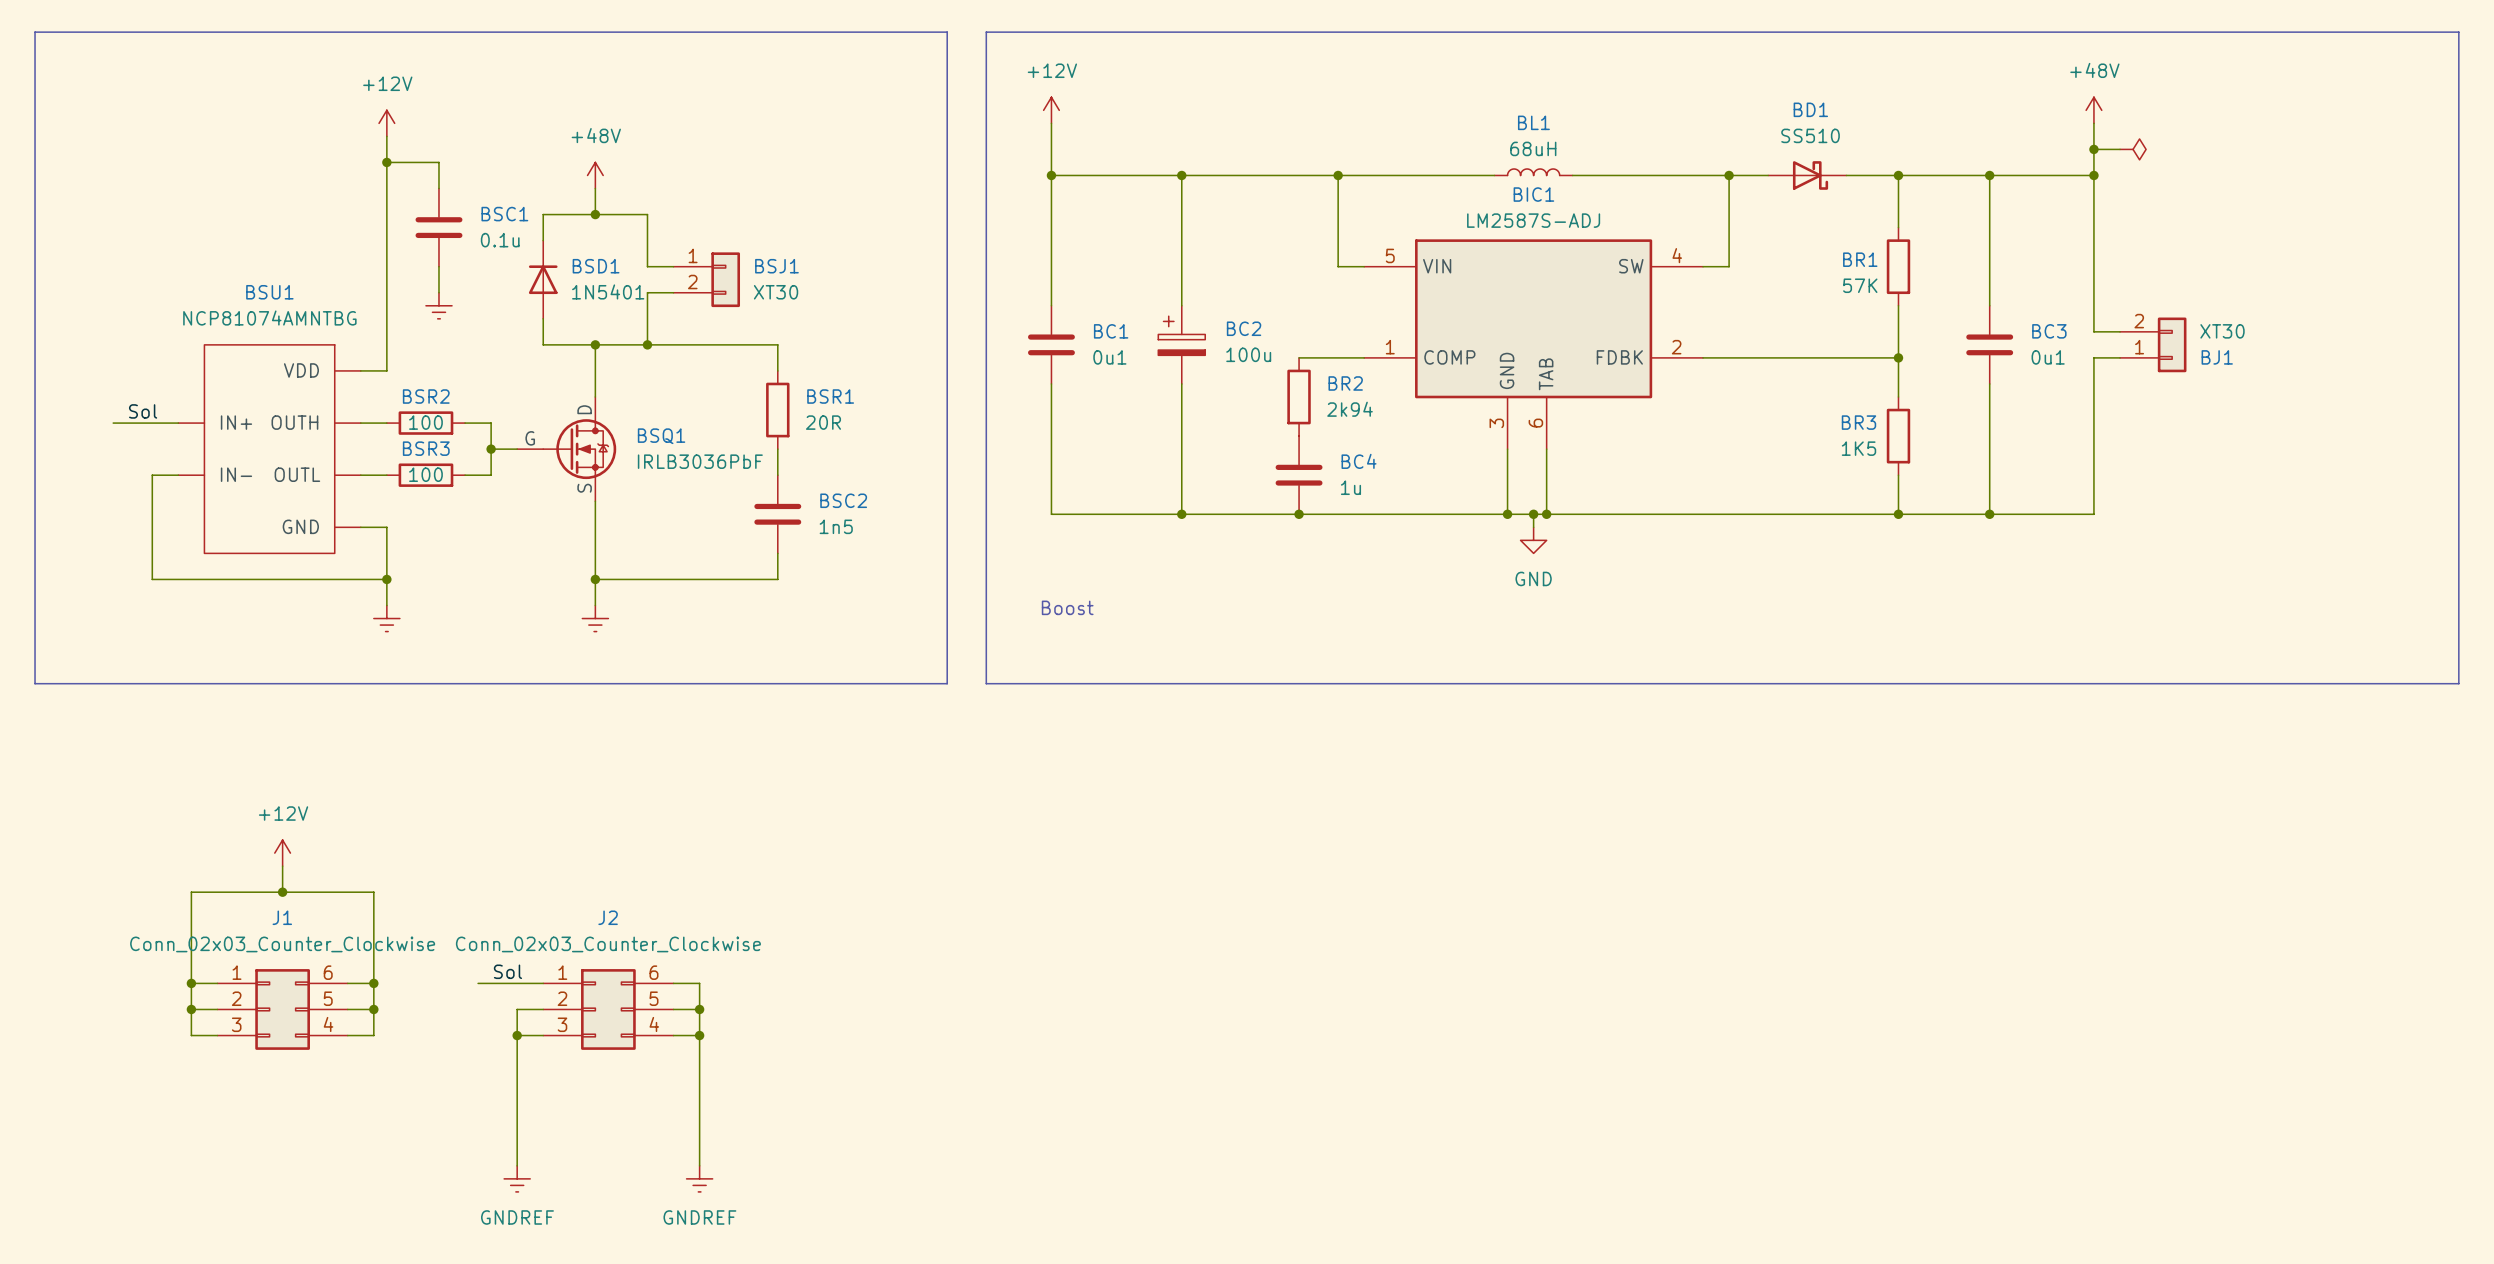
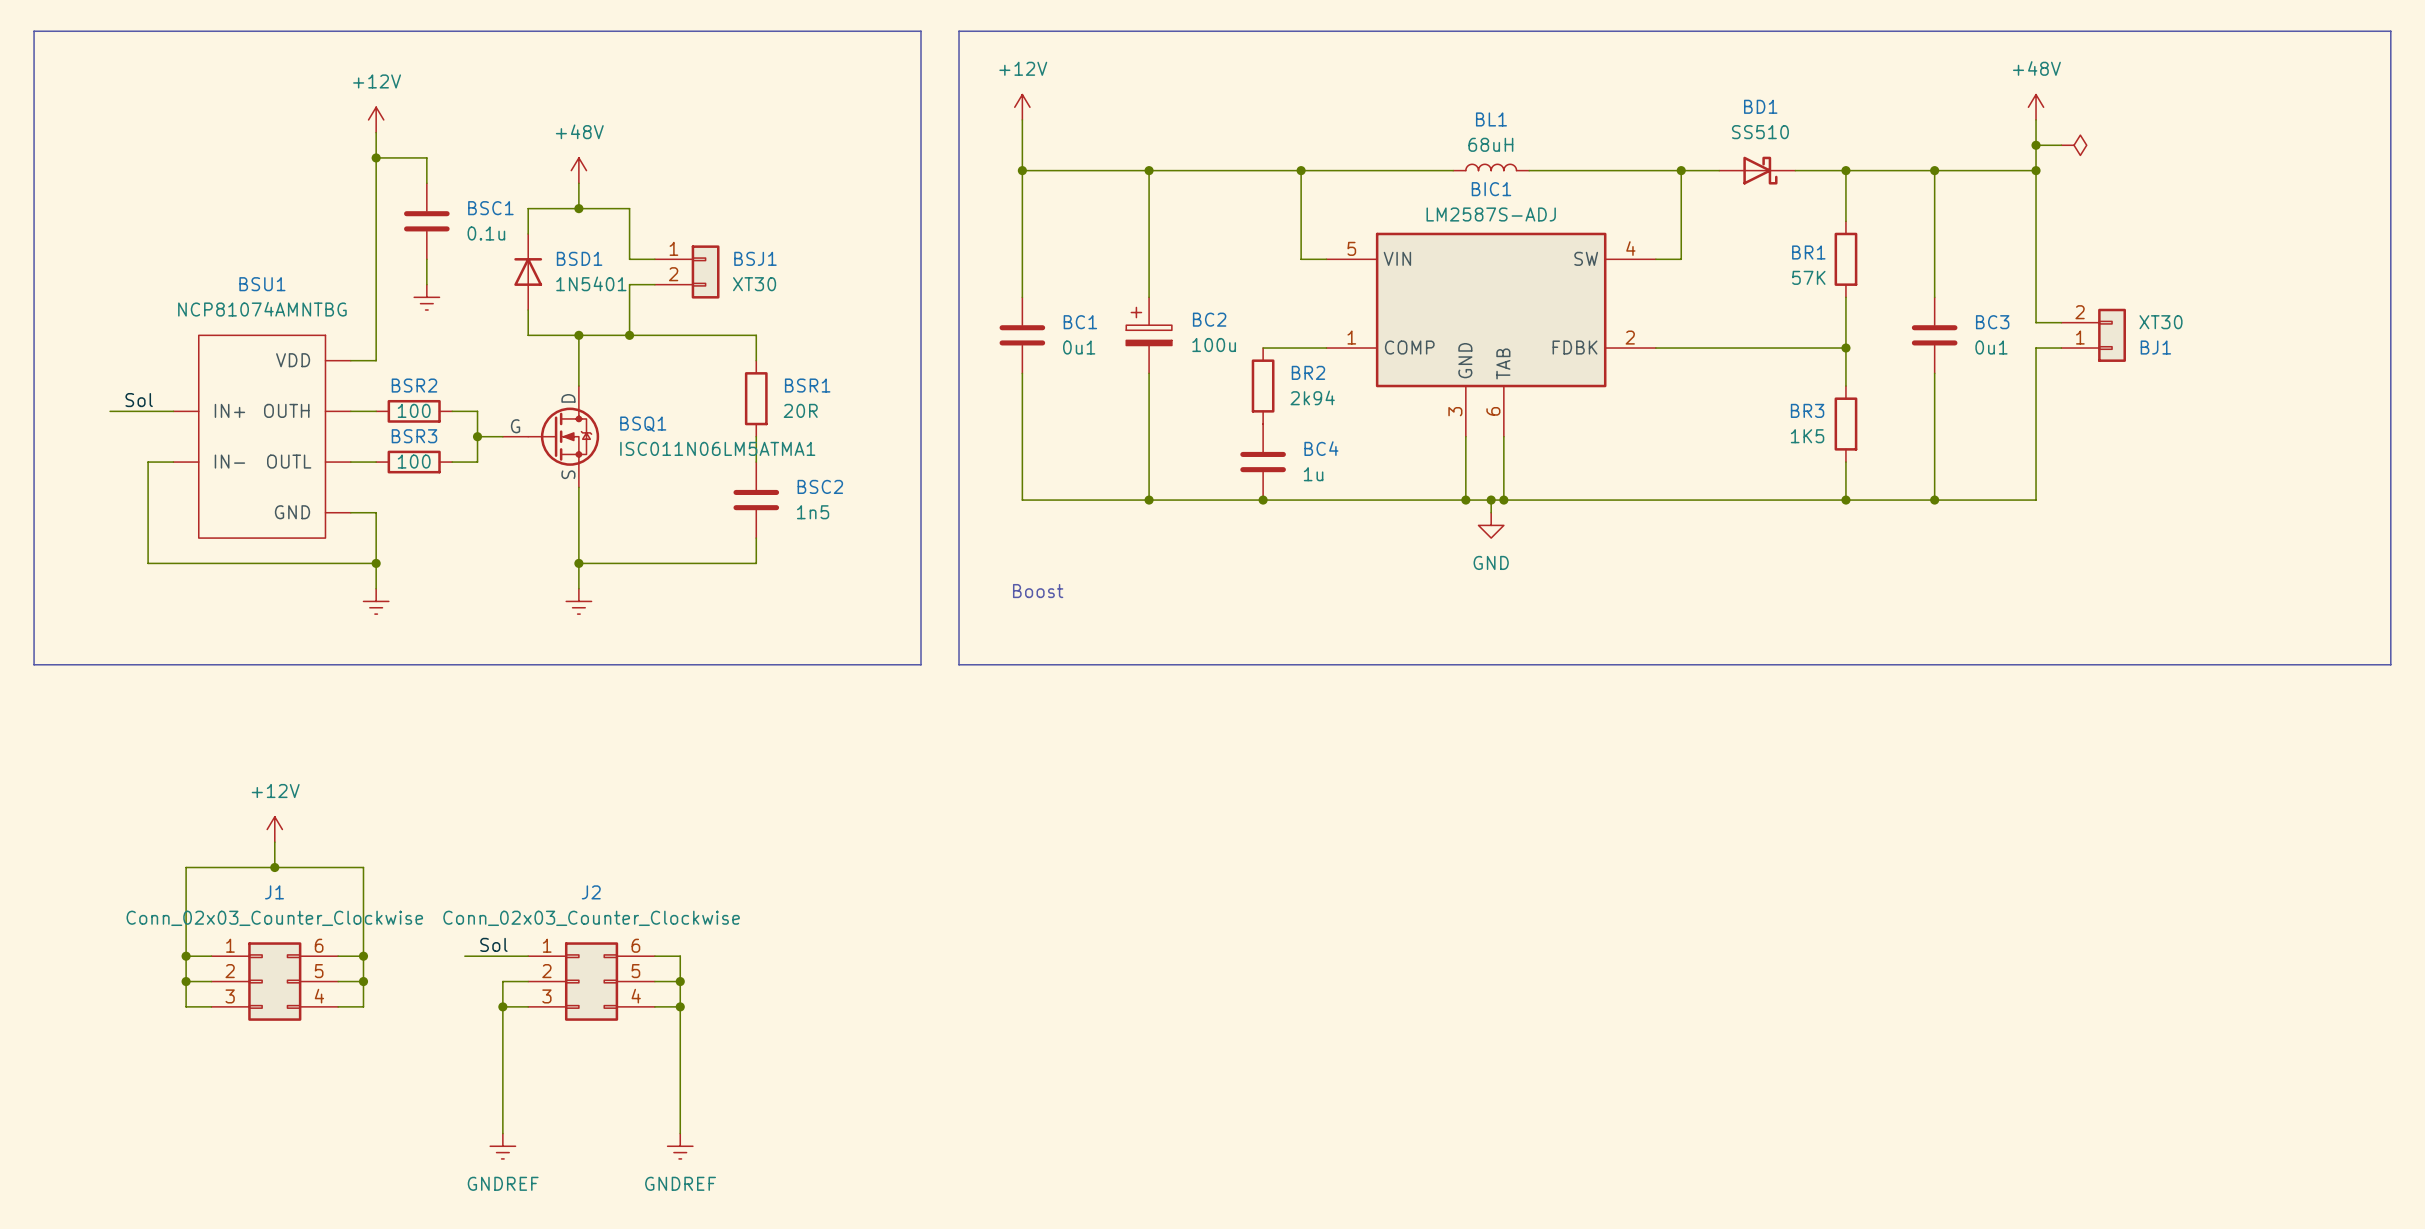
BSQ1 value: IRLB3036PbF (700, 461) -> ISC011N06LM5ATMA1 (717, 448)

